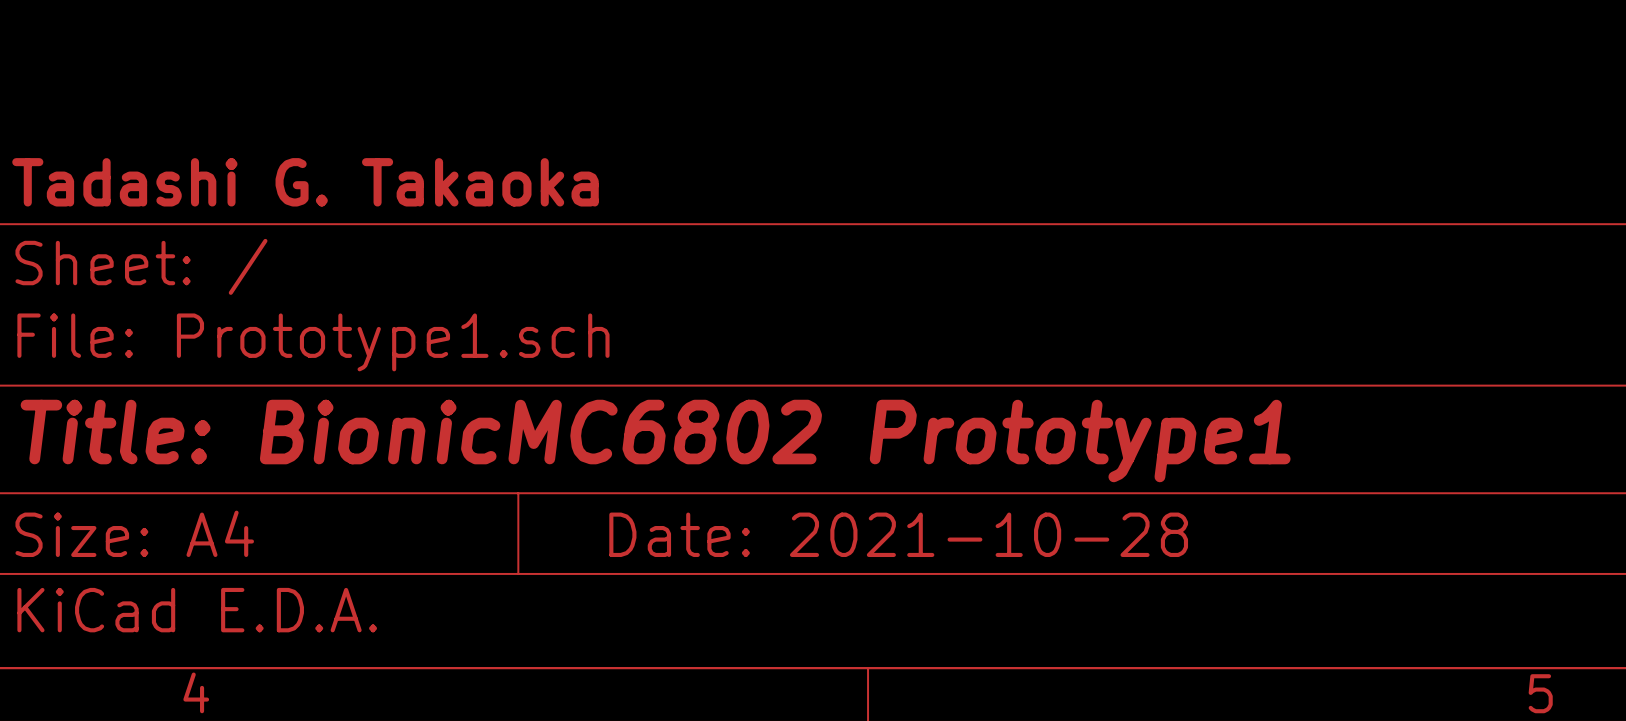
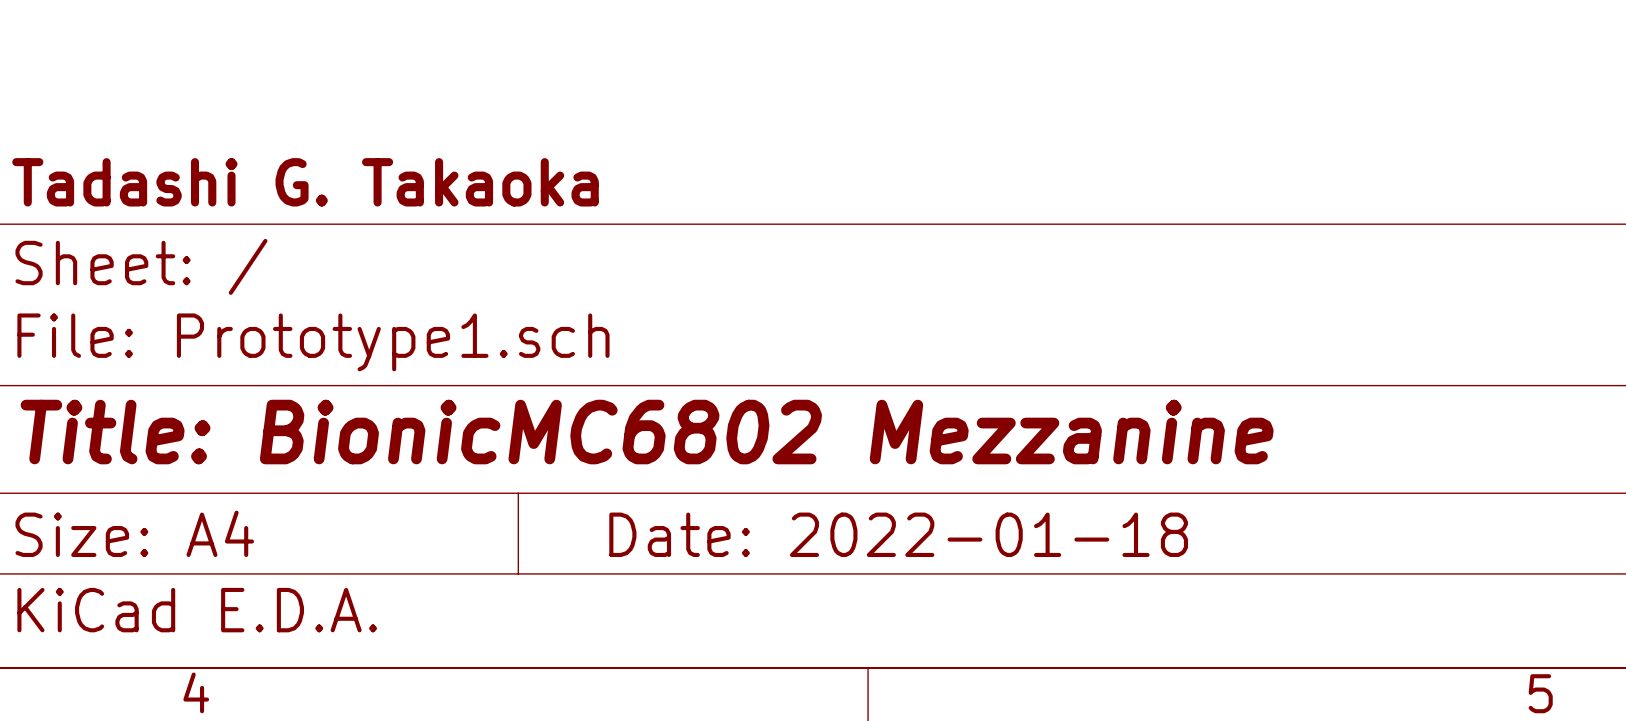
title block: Title: BionicMC6802 Prototype1 (655, 441) -> Title: BionicMC6802 Mezzanine (647, 432)
title block: Date: 2021-10-28 (898, 534) -> Date: 2022-01-18 (898, 534)

